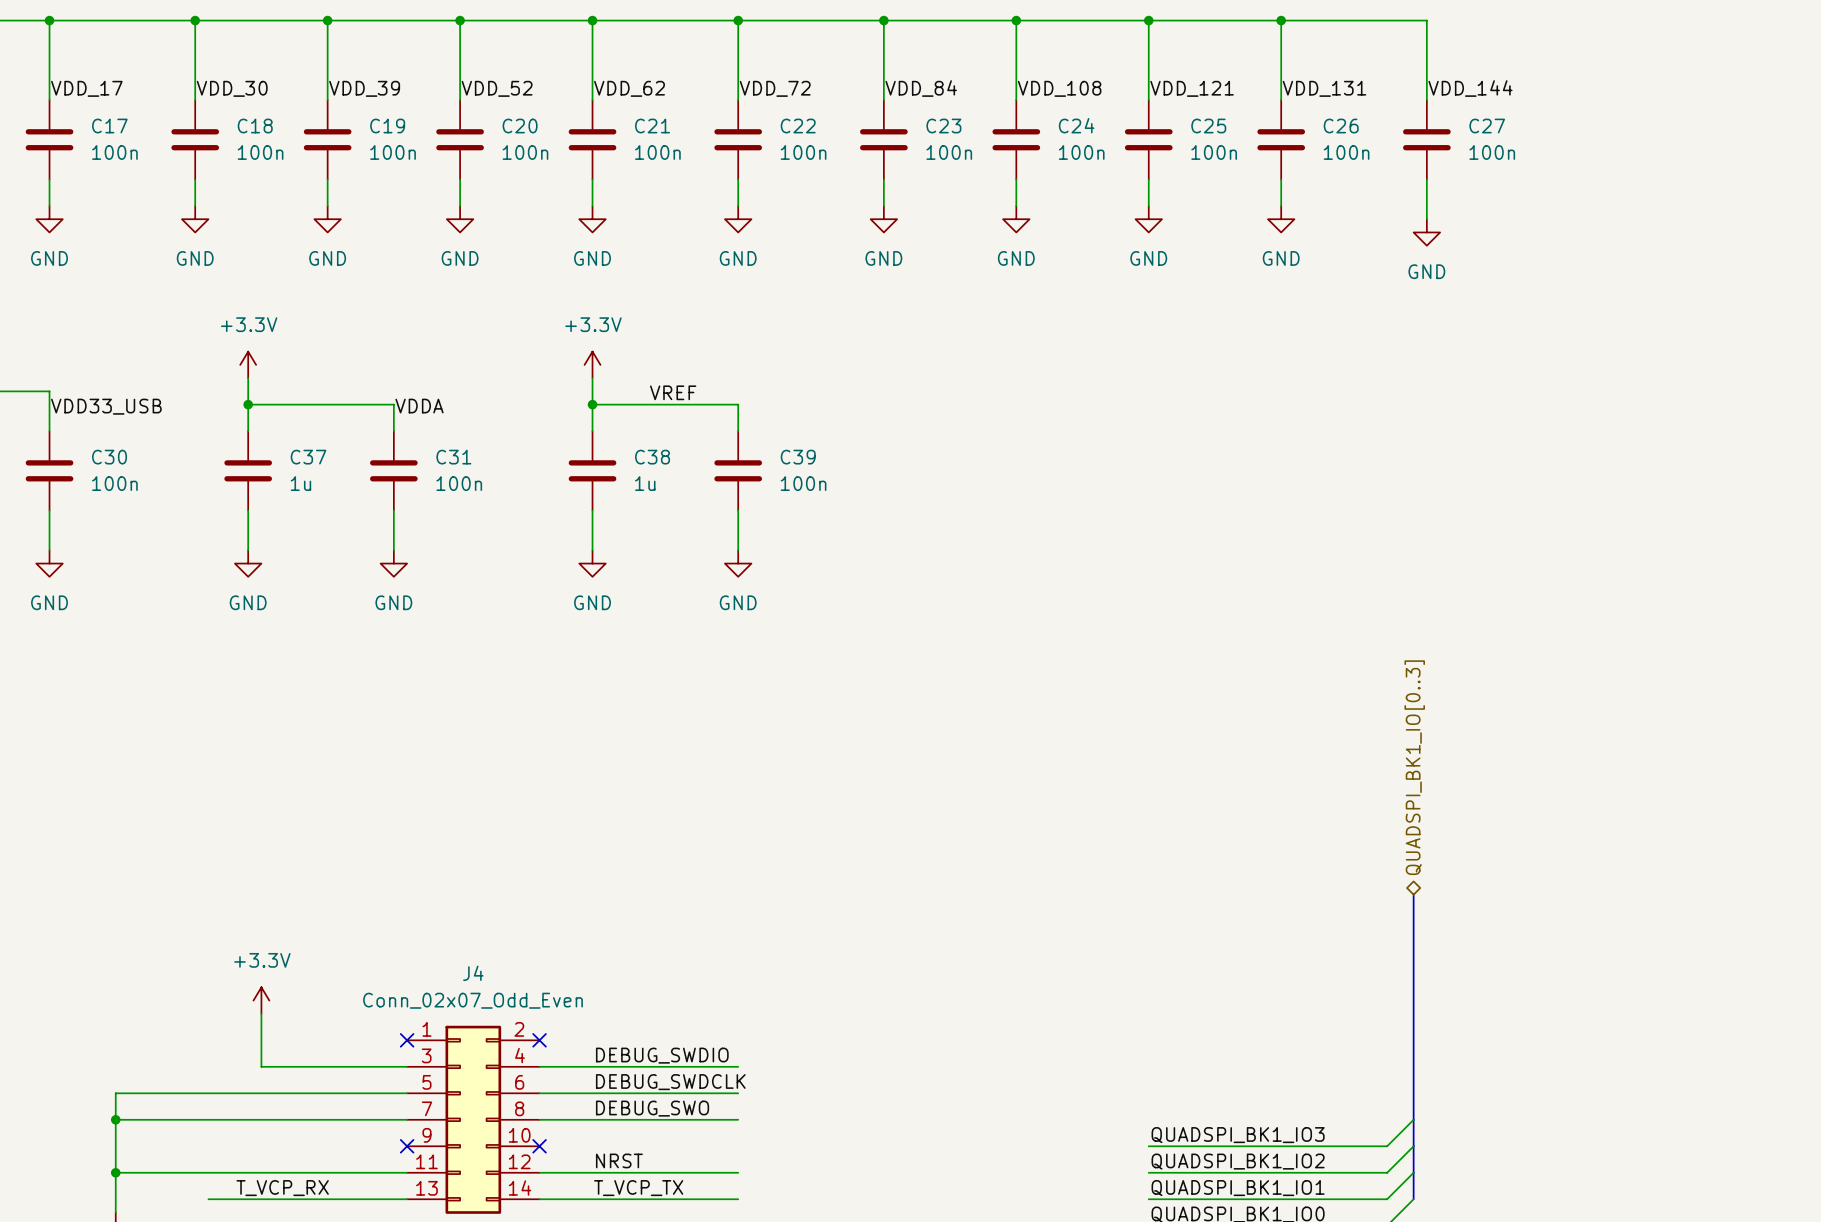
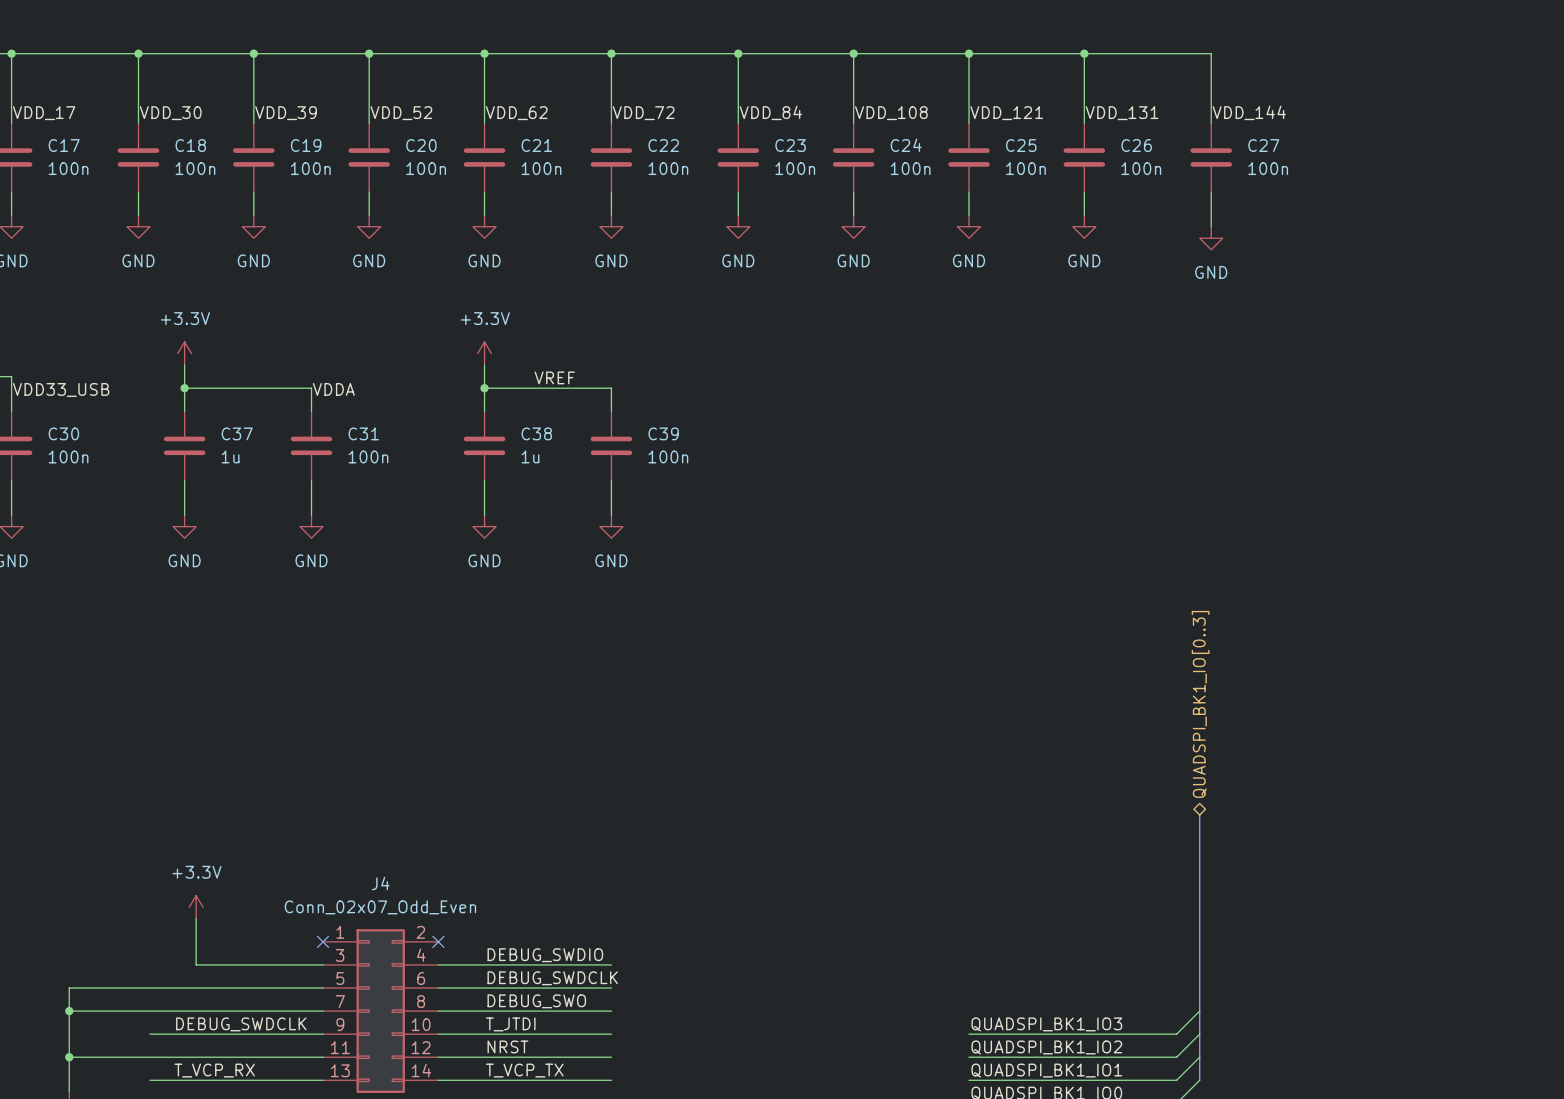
label: none -> DEBUG_SWDCLK (241, 1024)
label: none -> T_JTDI (510, 1024)
wire: none -> (150, 1034) (323, 1034)
no-connect mark: (407, 1146) -> none
wire: none -> (438, 1034) (611, 1034)
no-connect mark: (539, 1146) -> none

